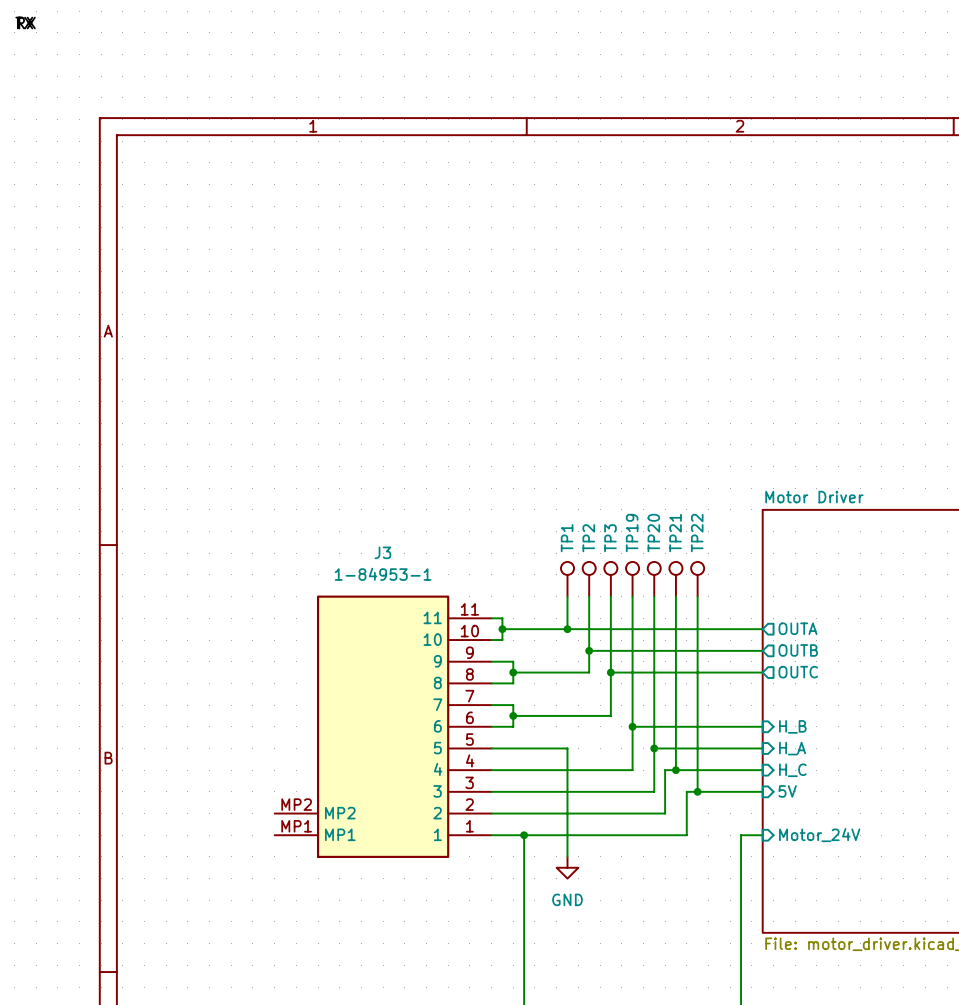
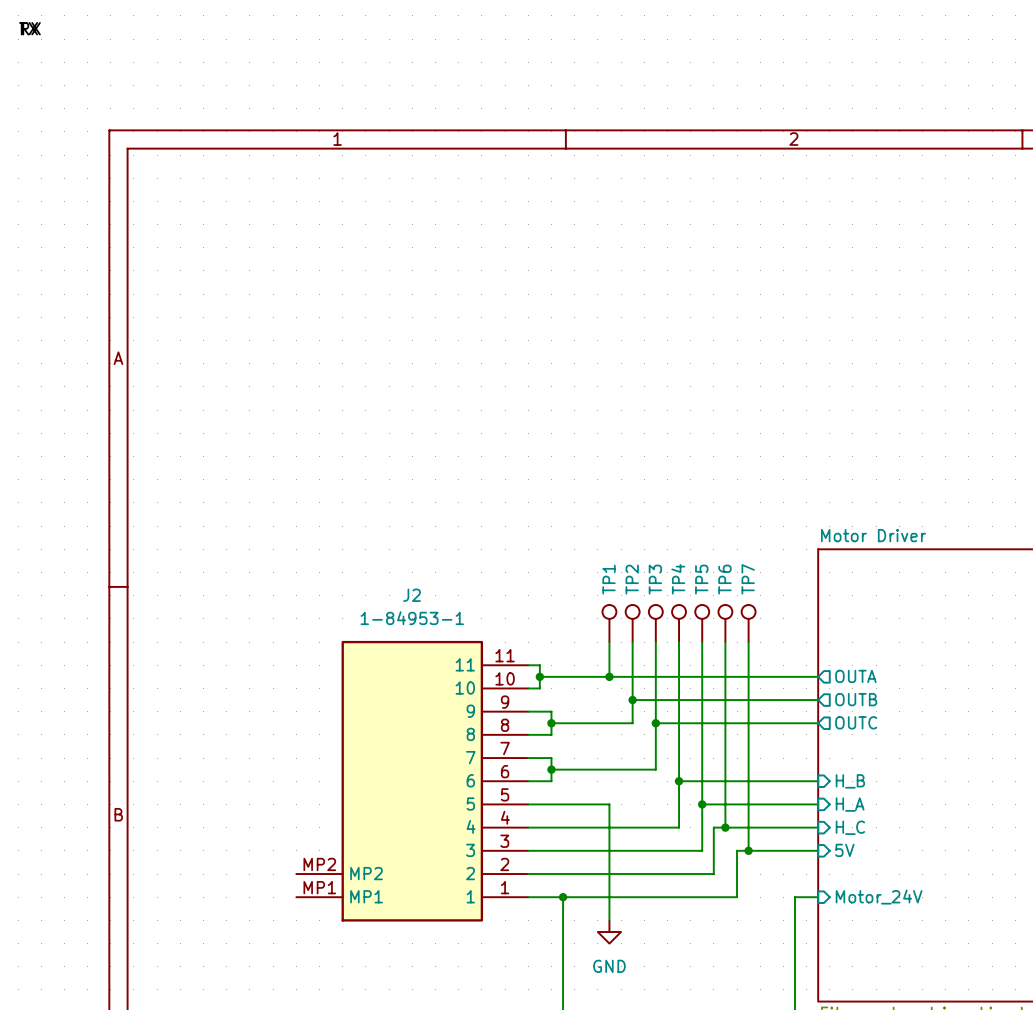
TP19 name: TP19 (632, 533) -> TP4 (678, 579)
TP20 name: TP20 (653, 533) -> TP5 (701, 579)
TP21 name: TP21 (675, 533) -> TP6 (724, 579)
TP22 name: TP22 (697, 533) -> TP7 (748, 579)
J3 name: J3 (382, 552) -> J2 (412, 595)

